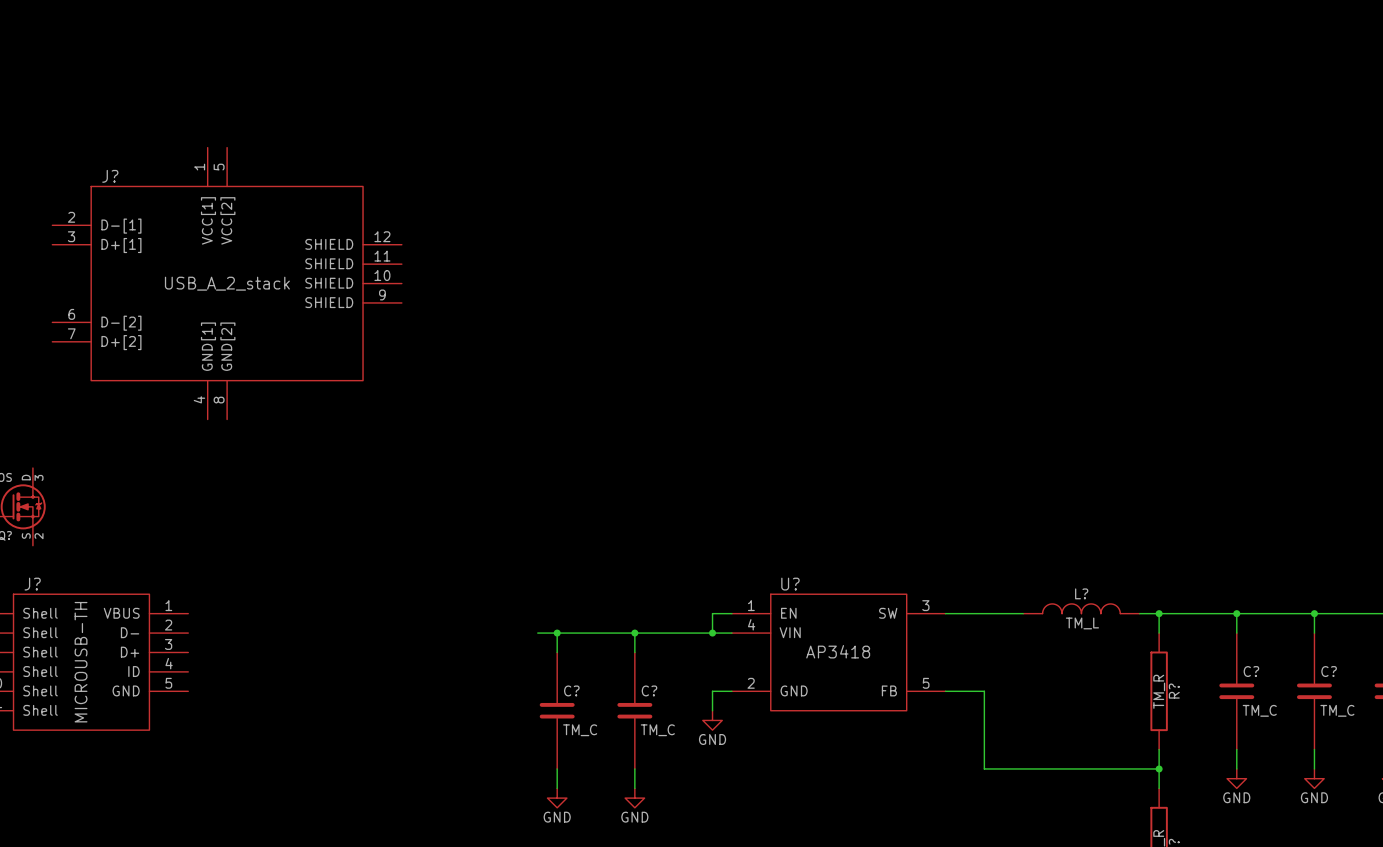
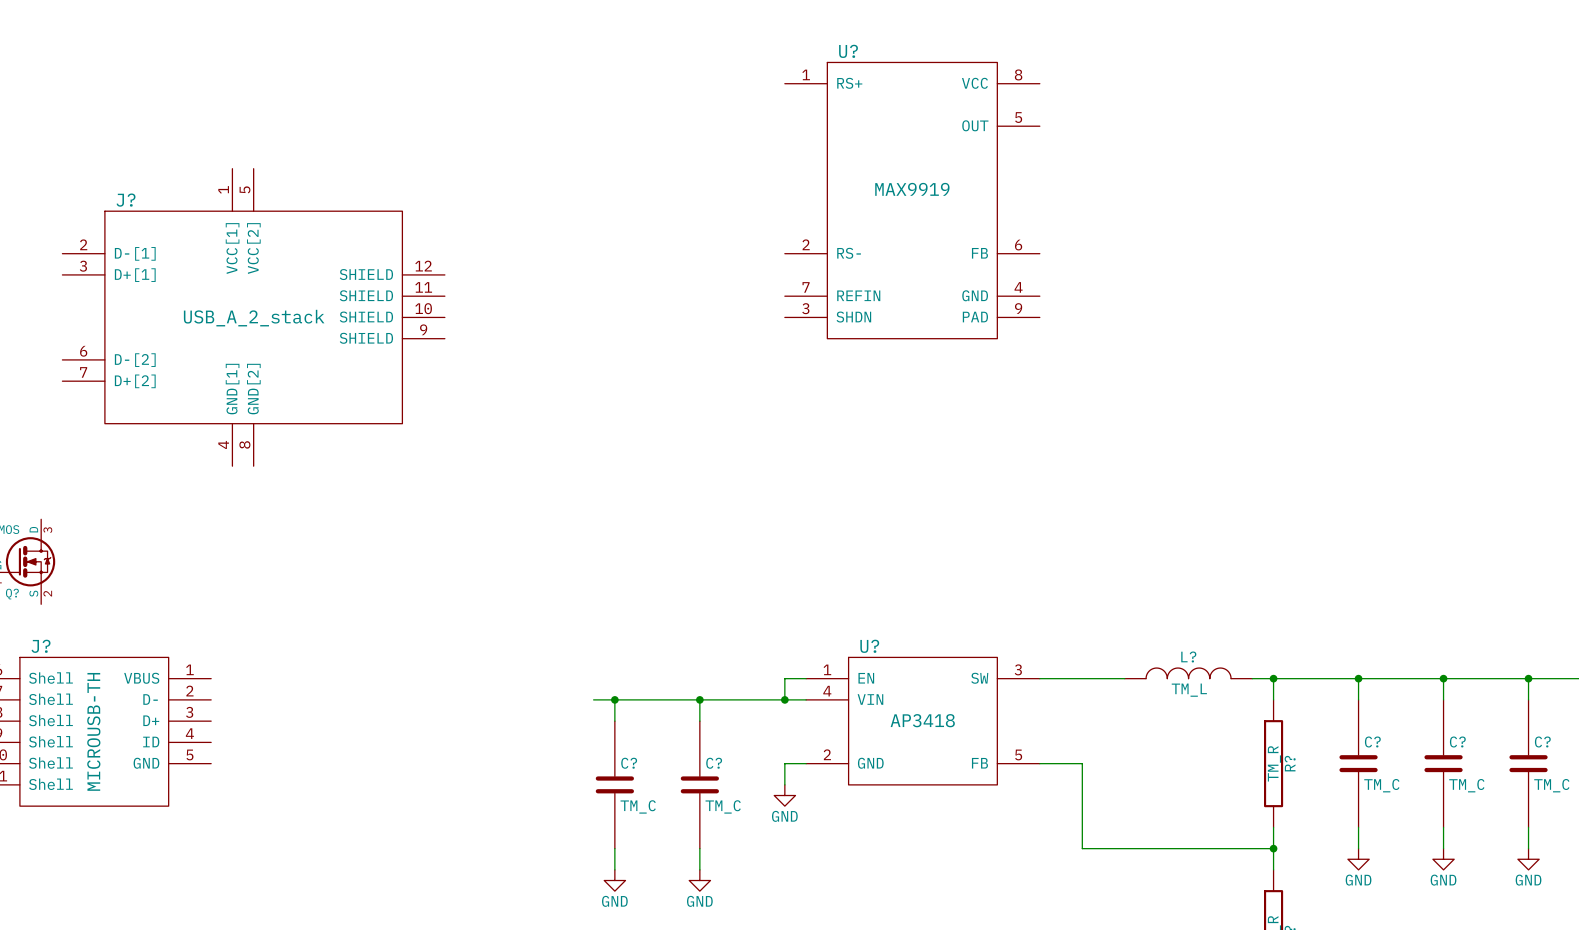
U?: none -> MAX9919 (912, 200)

